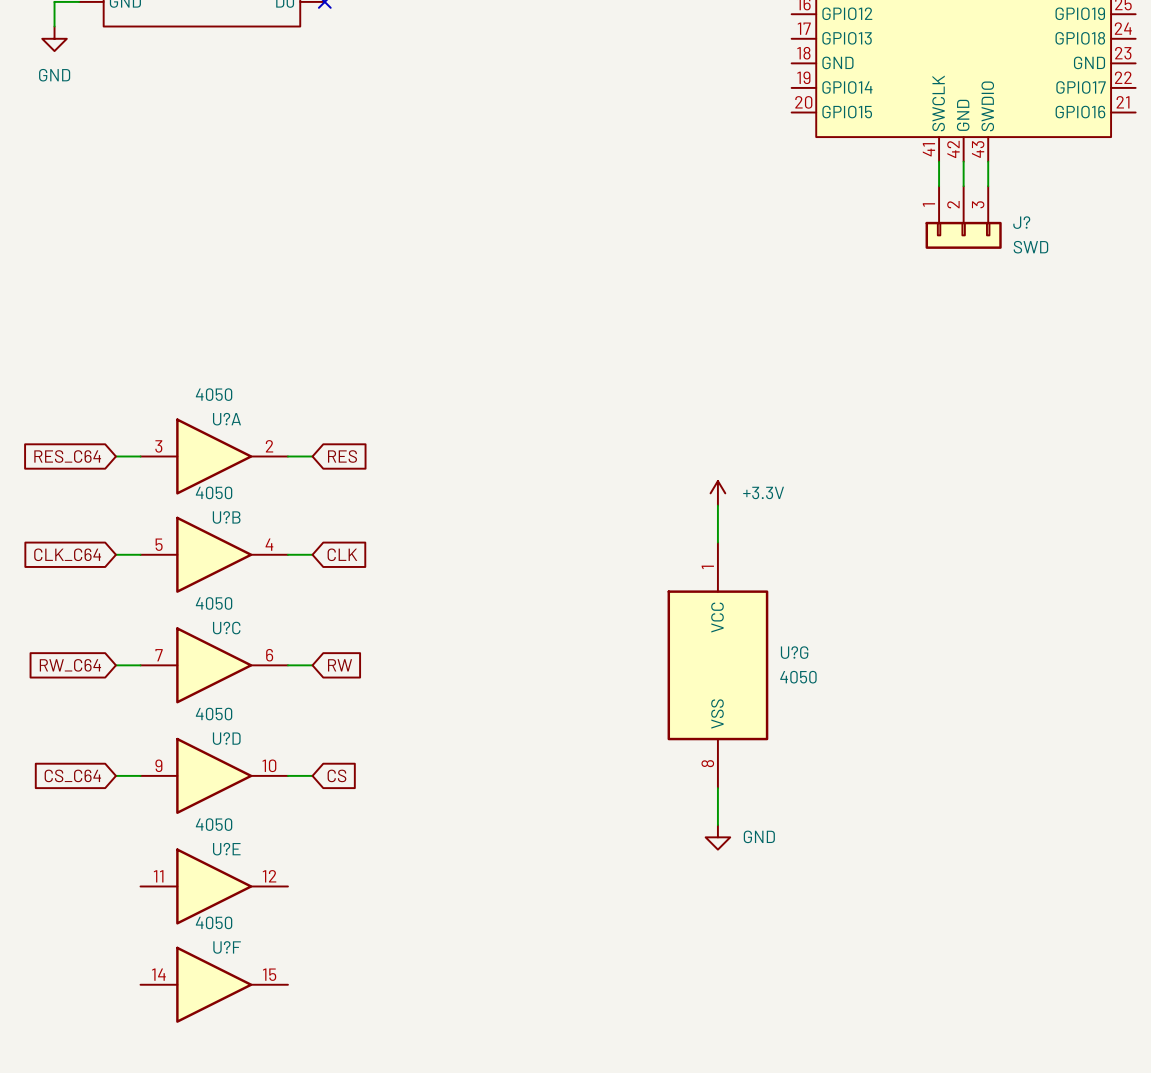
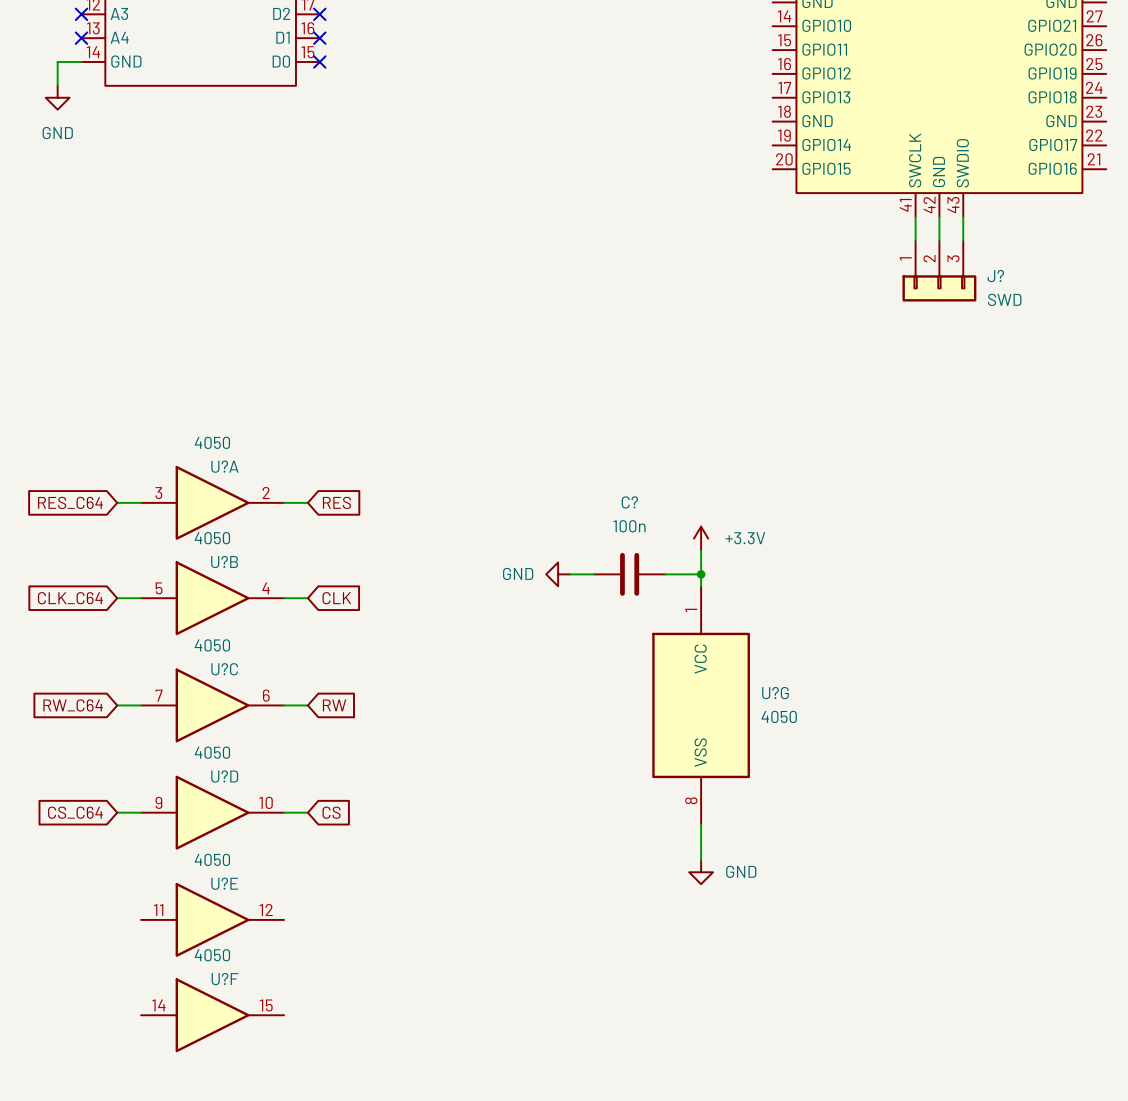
power symbol: none -> GND (558, 574)
wire: none -> (570, 574) (593, 574)
C?: none -> 100n (629, 574)
wire: none -> (665, 574) (701, 574)
junction: none -> (701, 574)

